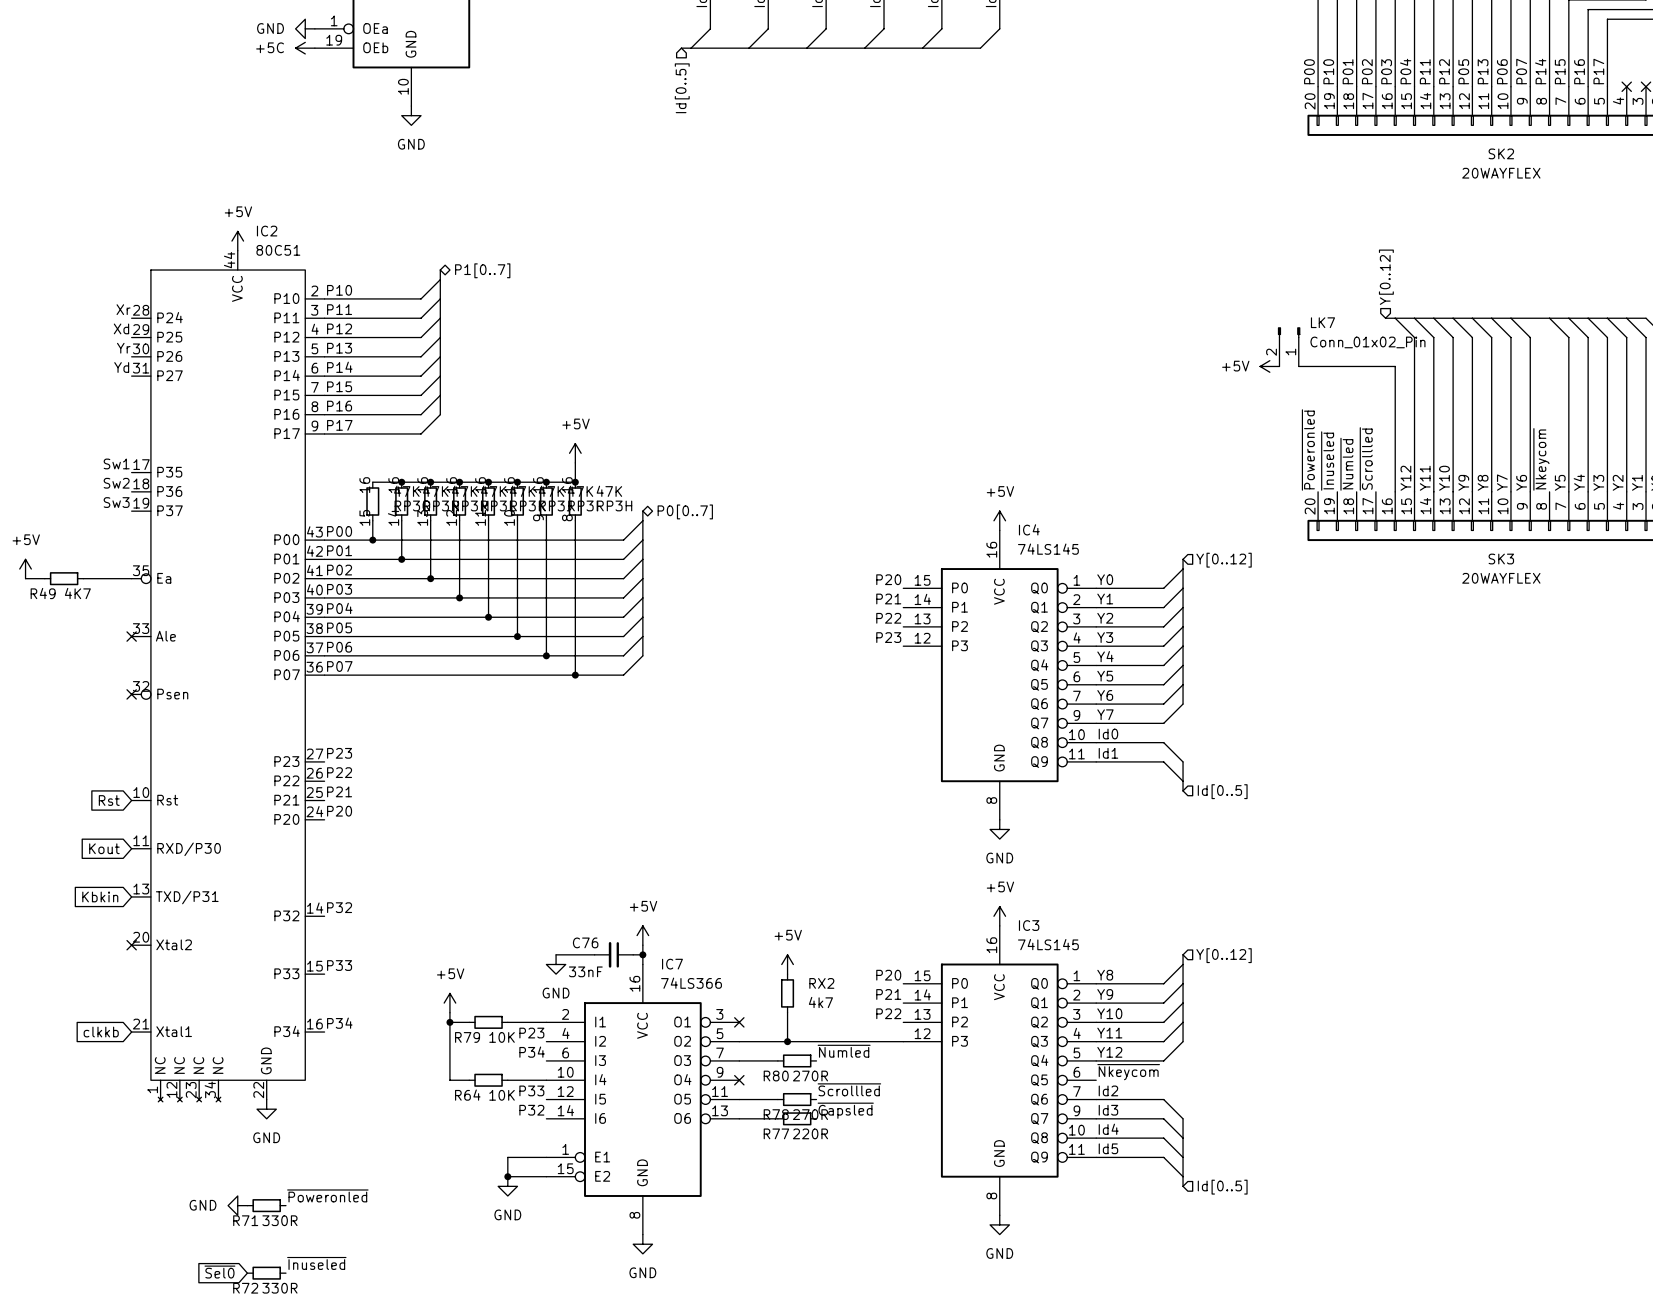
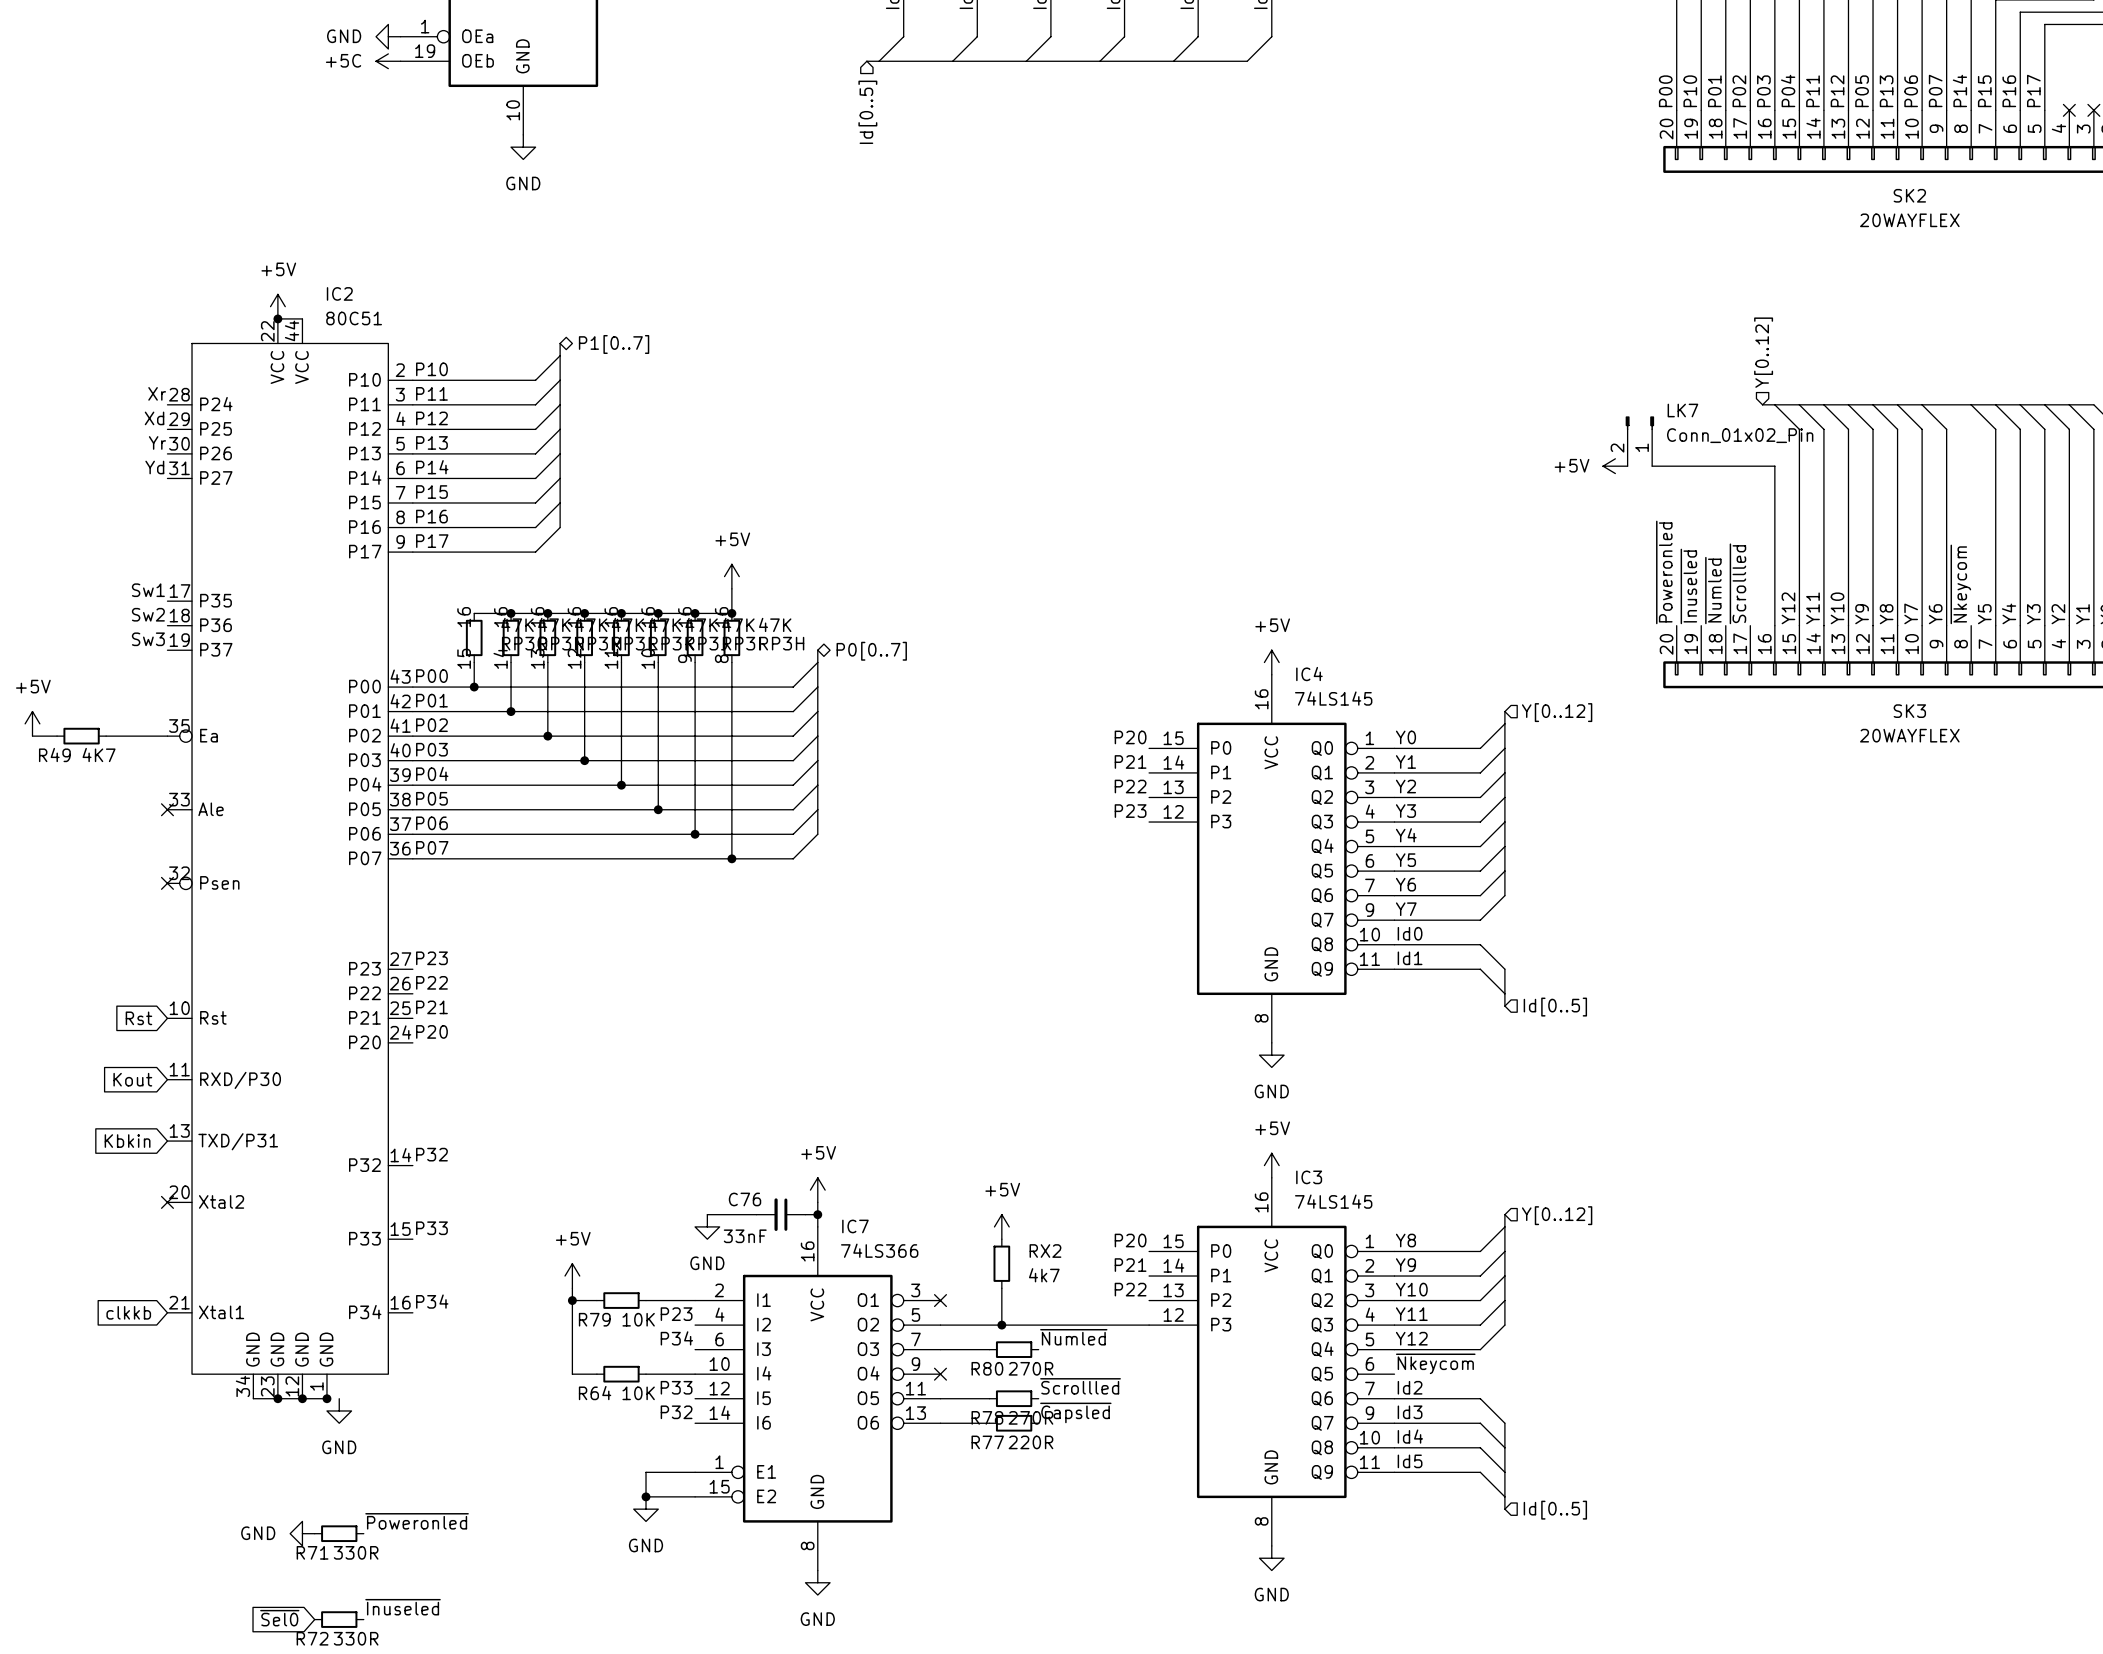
power symbol position: +5V (237, 241) -> +5V (277, 306)
IC2 symbol: [131, 250, 325, 1102] -> [167, 318, 413, 1399]
wire: none -> (277, 318) (302, 318)
junction: none -> (277, 318)
wire: none -> (253, 1398) (326, 1398)
junction: none -> (277, 1398)
junction: none -> (302, 1398)
junction: none -> (326, 1398)

